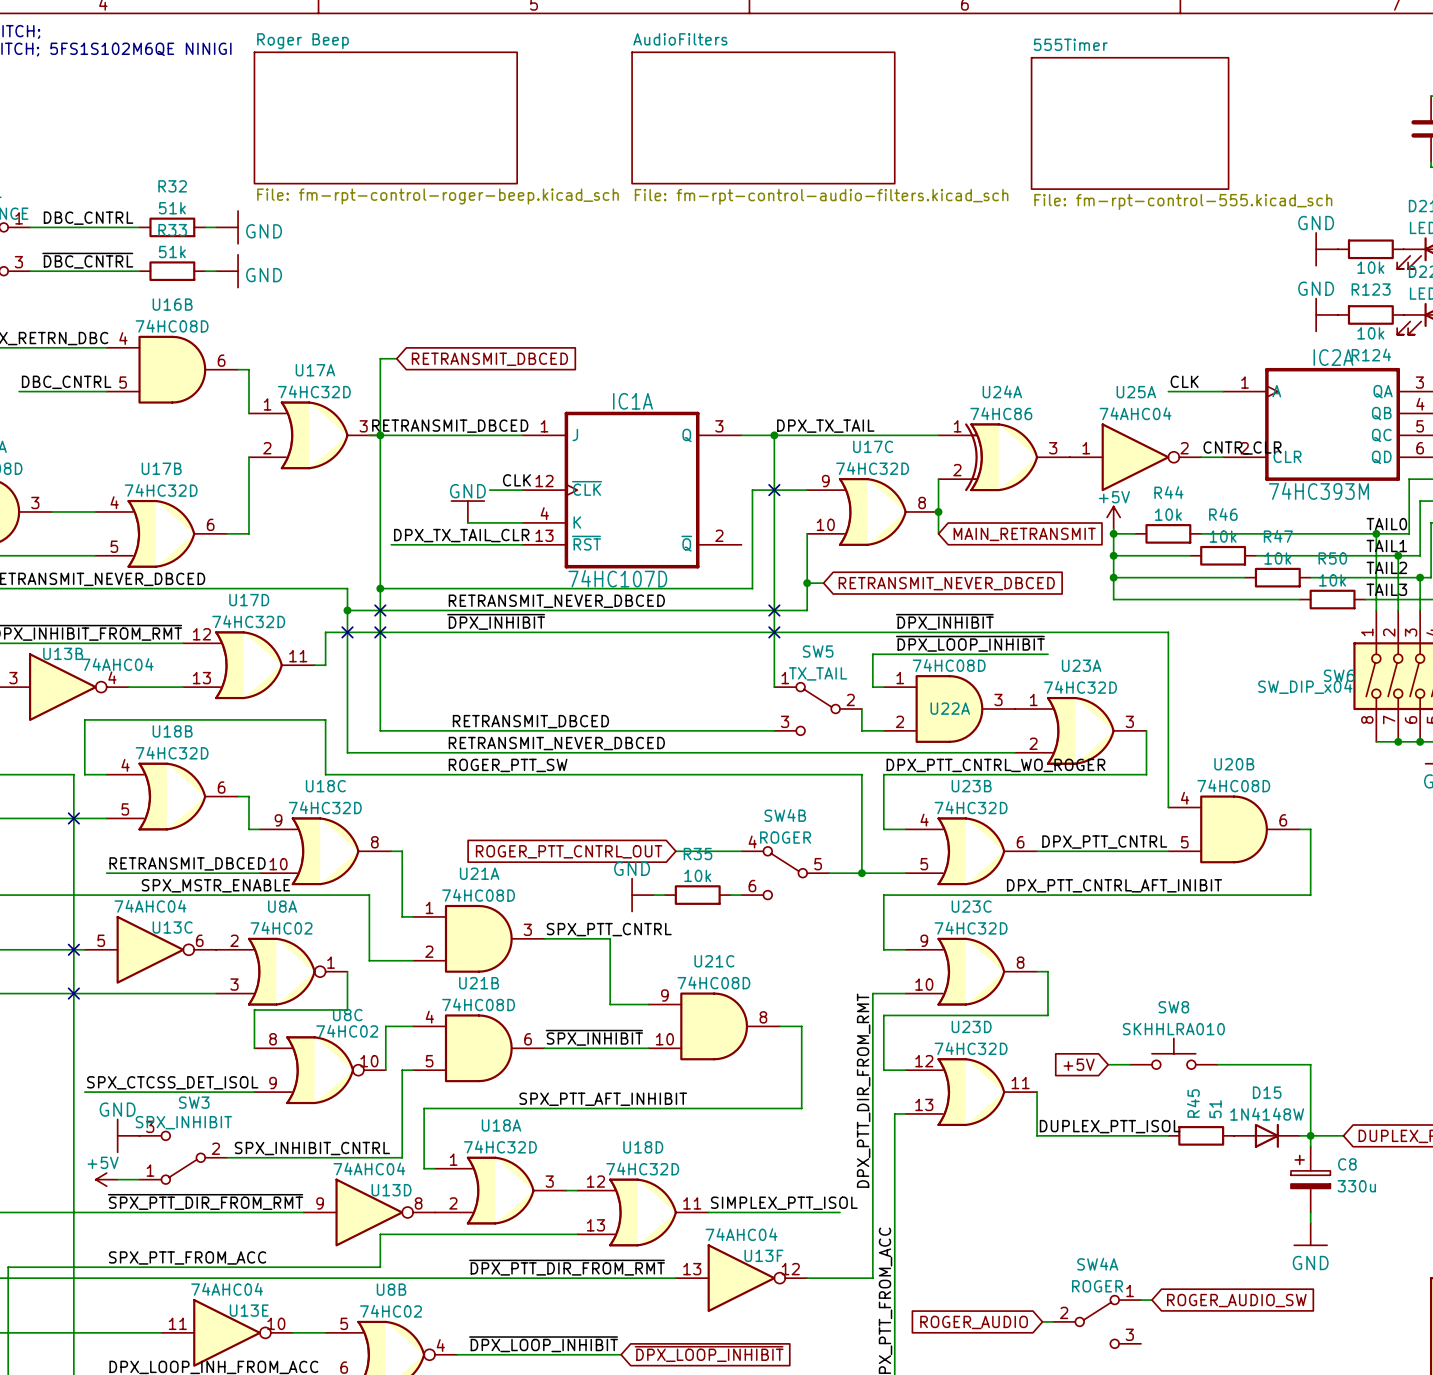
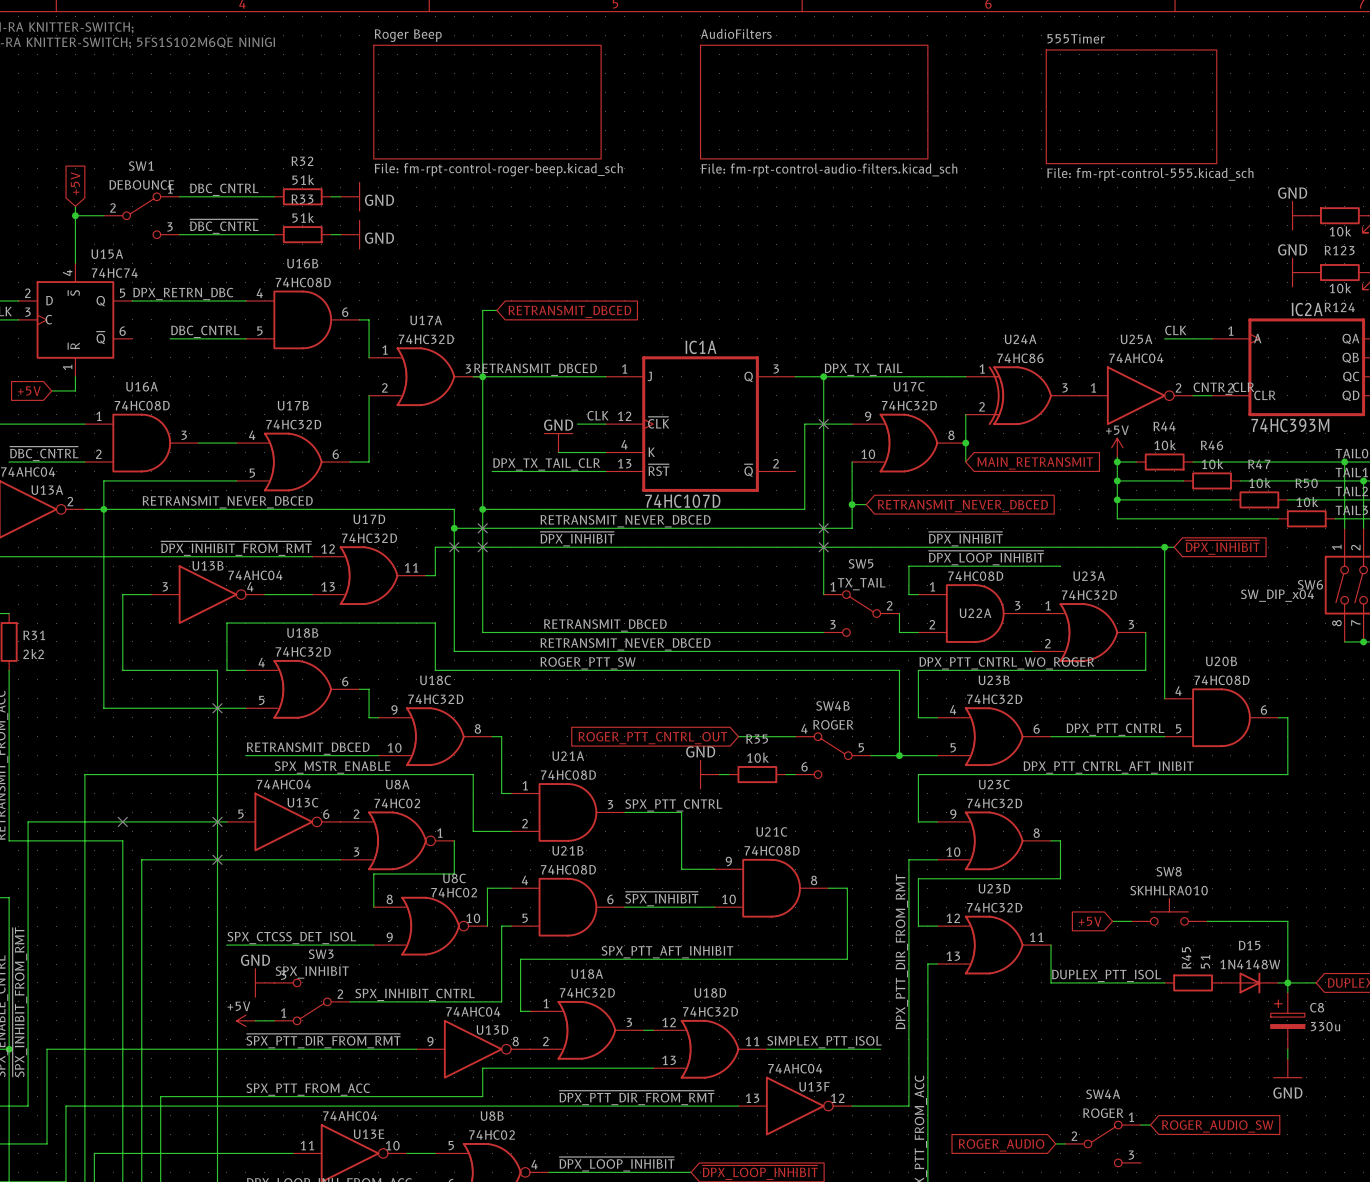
global label: none -> ~{DPX_INHIBIT} (1222, 547)
wire: none -> (1164, 547) (1174, 547)
junction: none -> (1164, 547)

